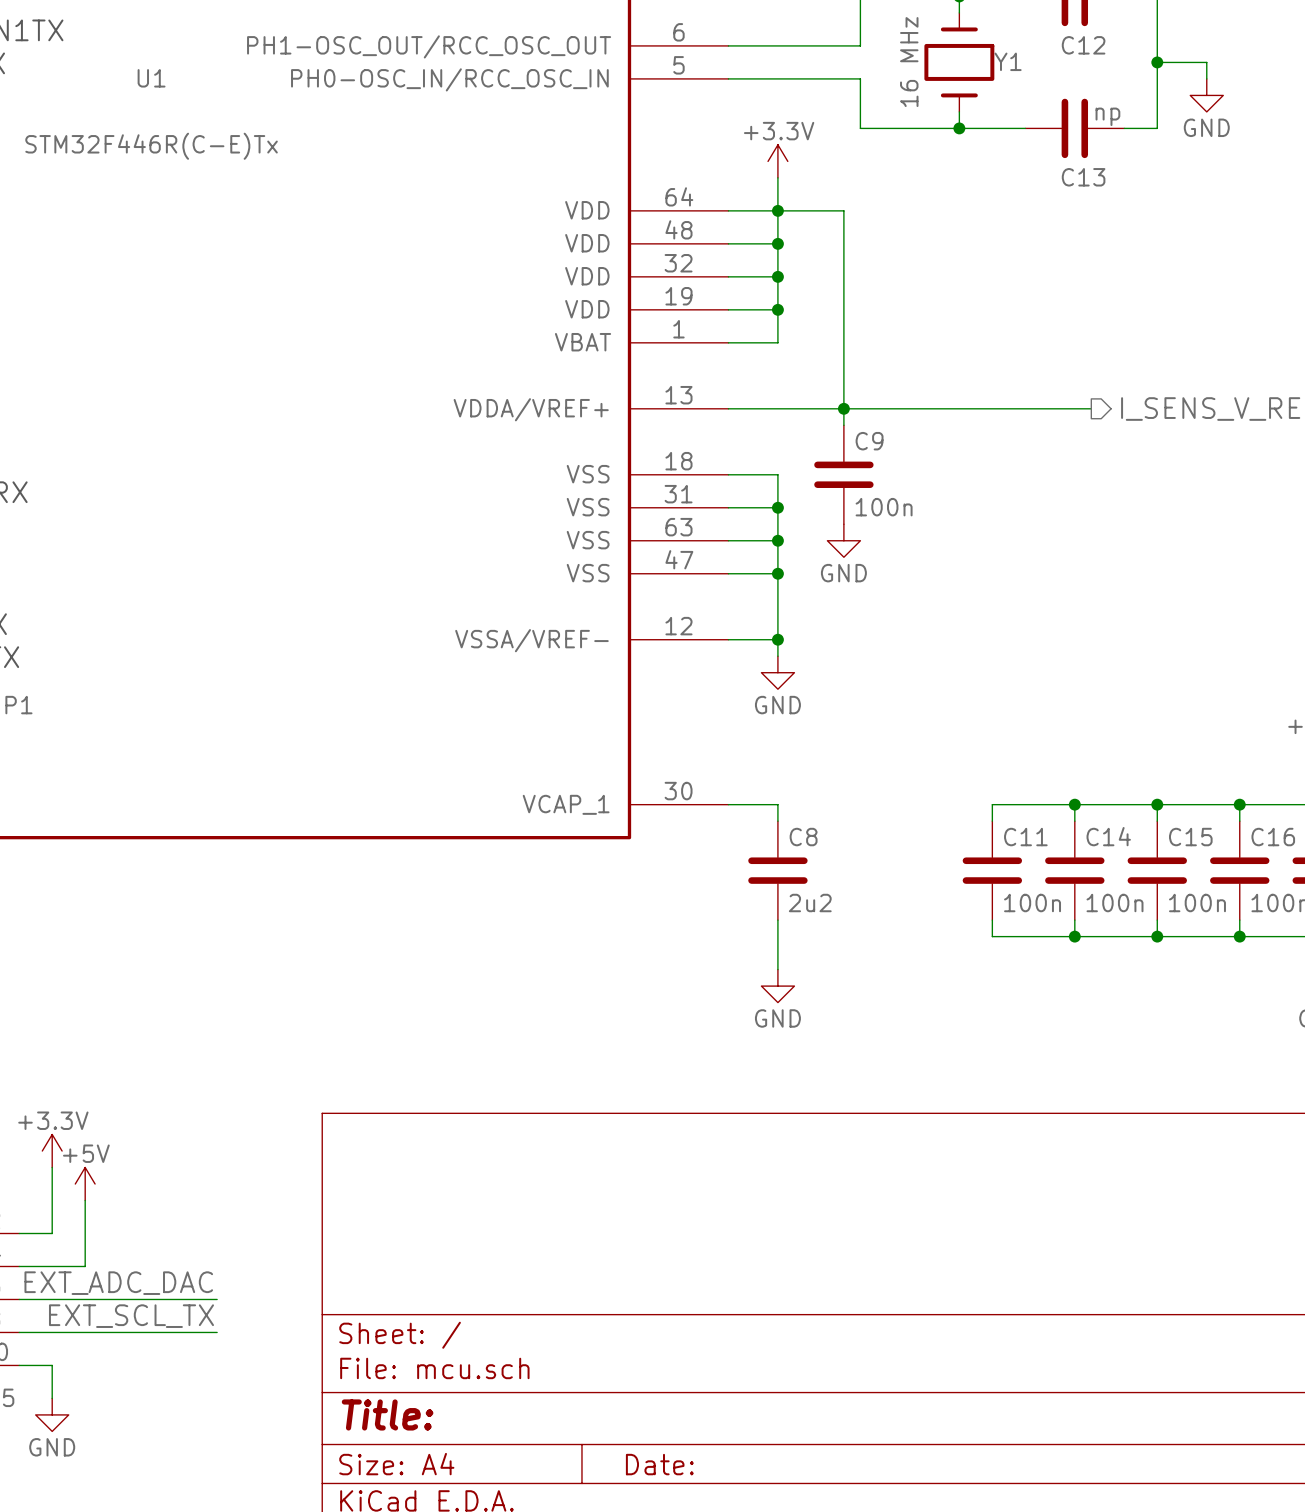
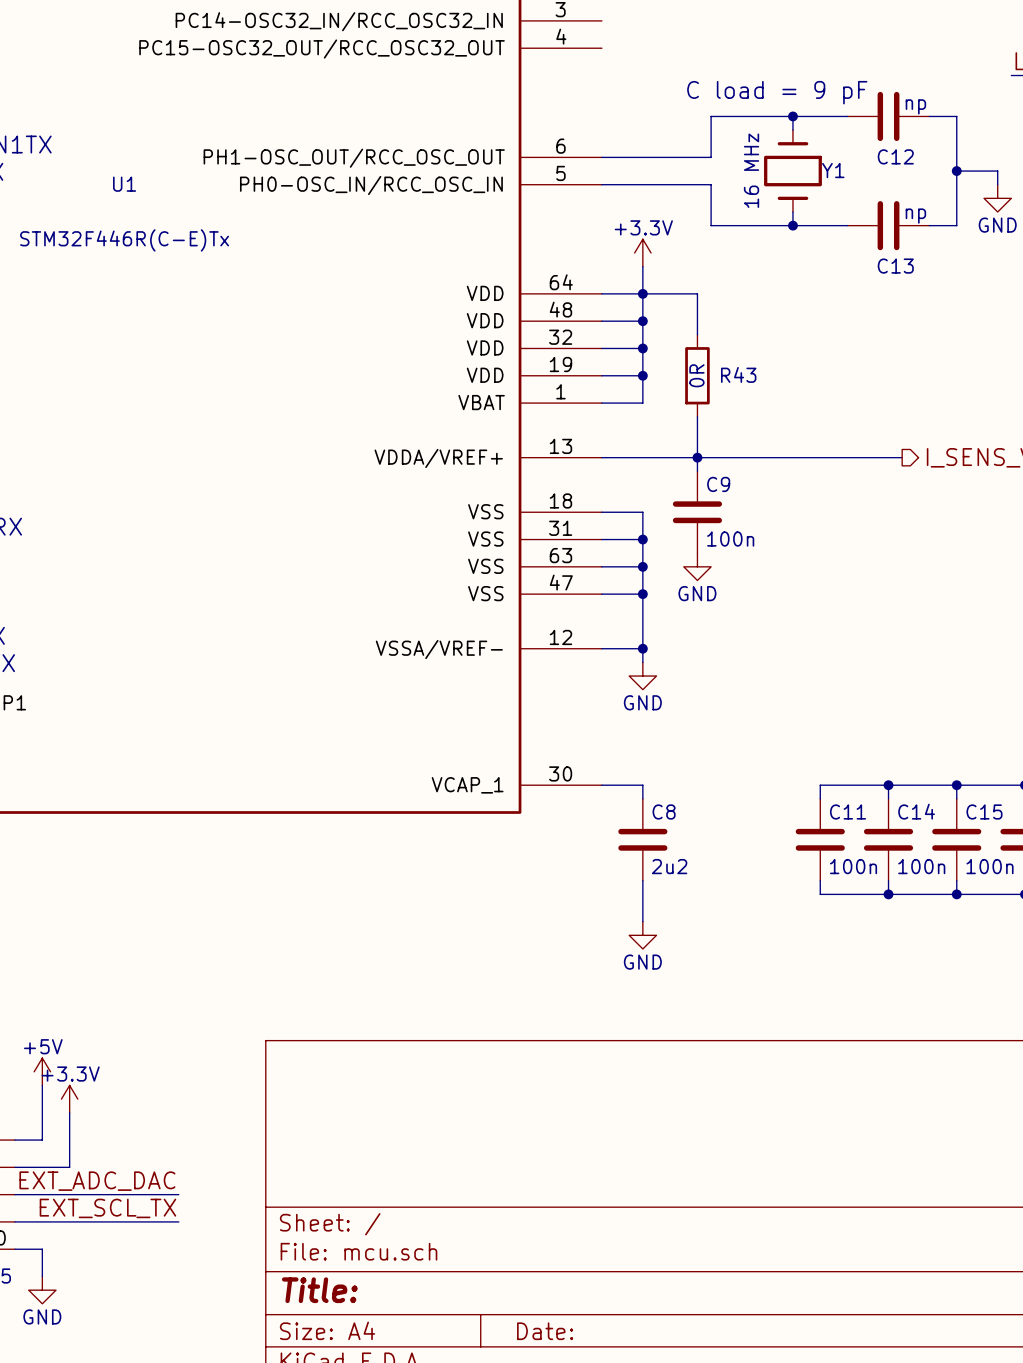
wire: (843, 260) (843, 359) -> none
R43: none -> 0R (697, 375)
power symbol: +3.3V (52, 1151) -> +5V (42, 1071)
power symbol: +5V (85, 1184) -> +3.3V (69, 1099)

